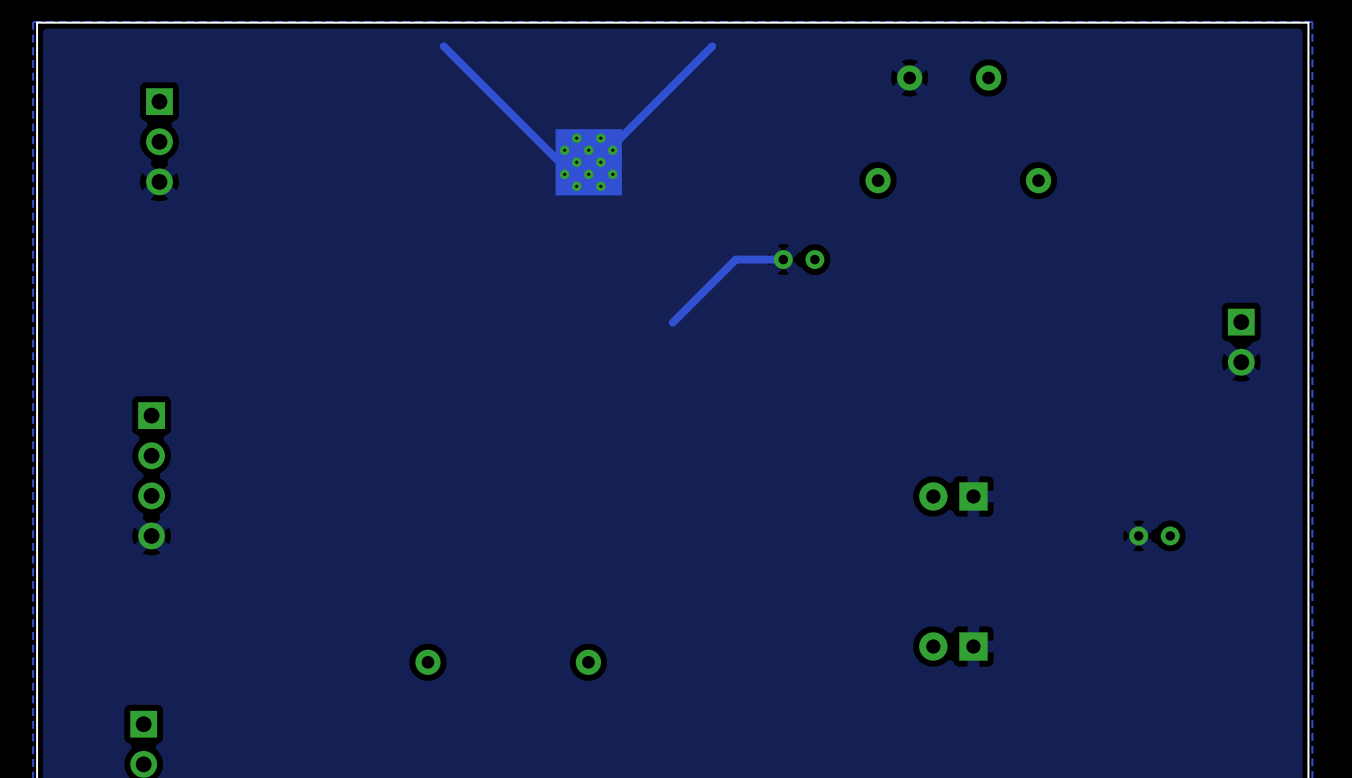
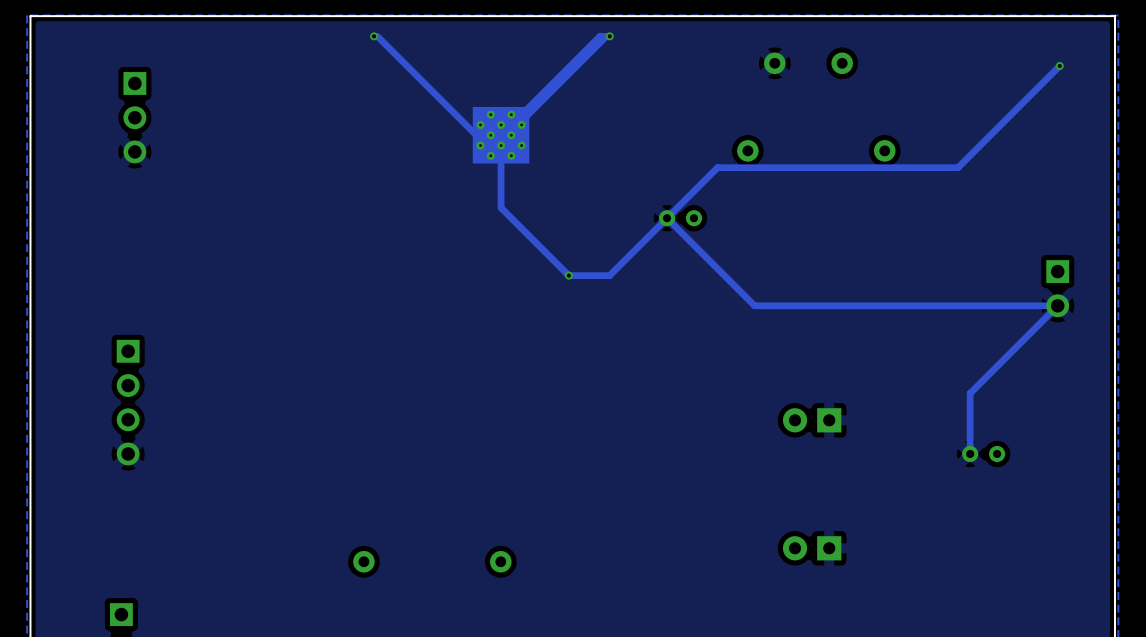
via: none -> (374, 36)
track: none -> (609, 36) (599, 36) (501, 135) (501, 207) (568, 275) (609, 275) (717, 167) (958, 167) (1059, 65)
via: none -> (609, 36)
via: none -> (1059, 65)
track: (783, 259) (735, 259) (672, 322) -> (667, 218) (754, 305) (1057, 305) (970, 393) (970, 453)
via: none -> (568, 275)

